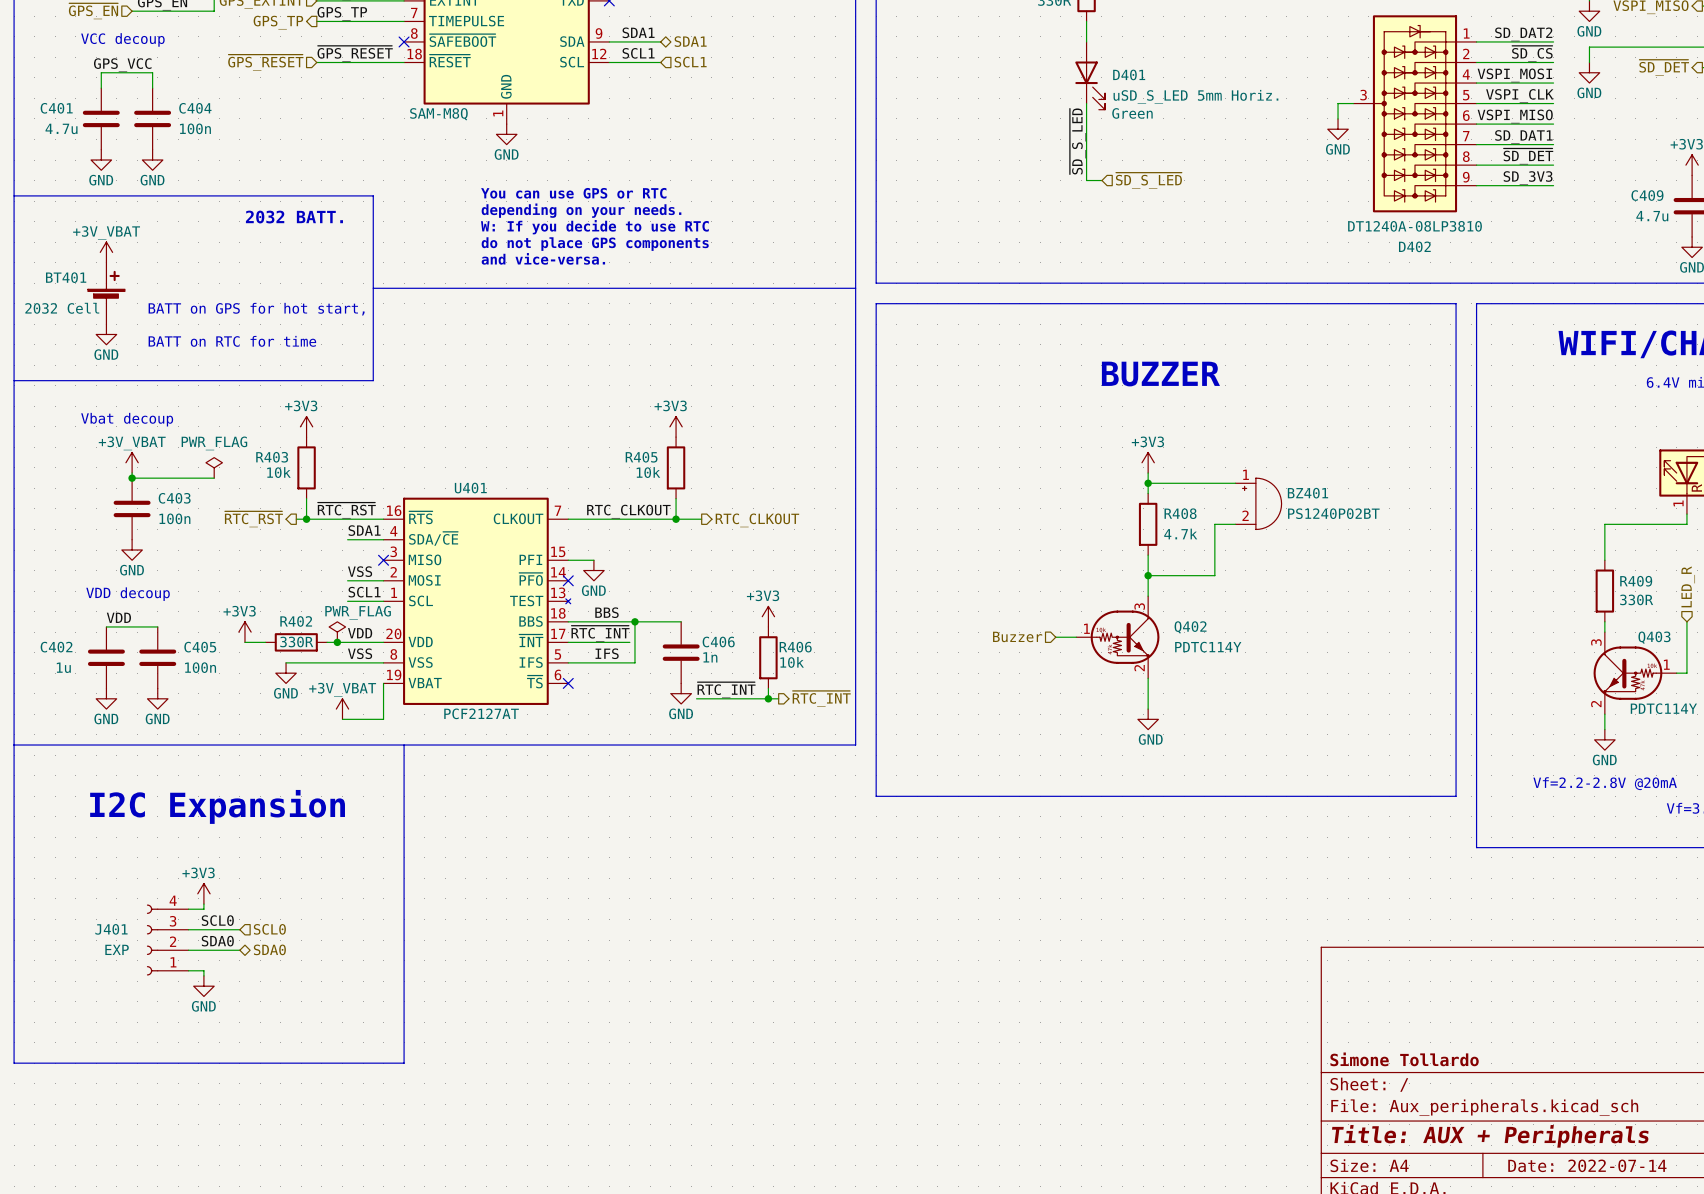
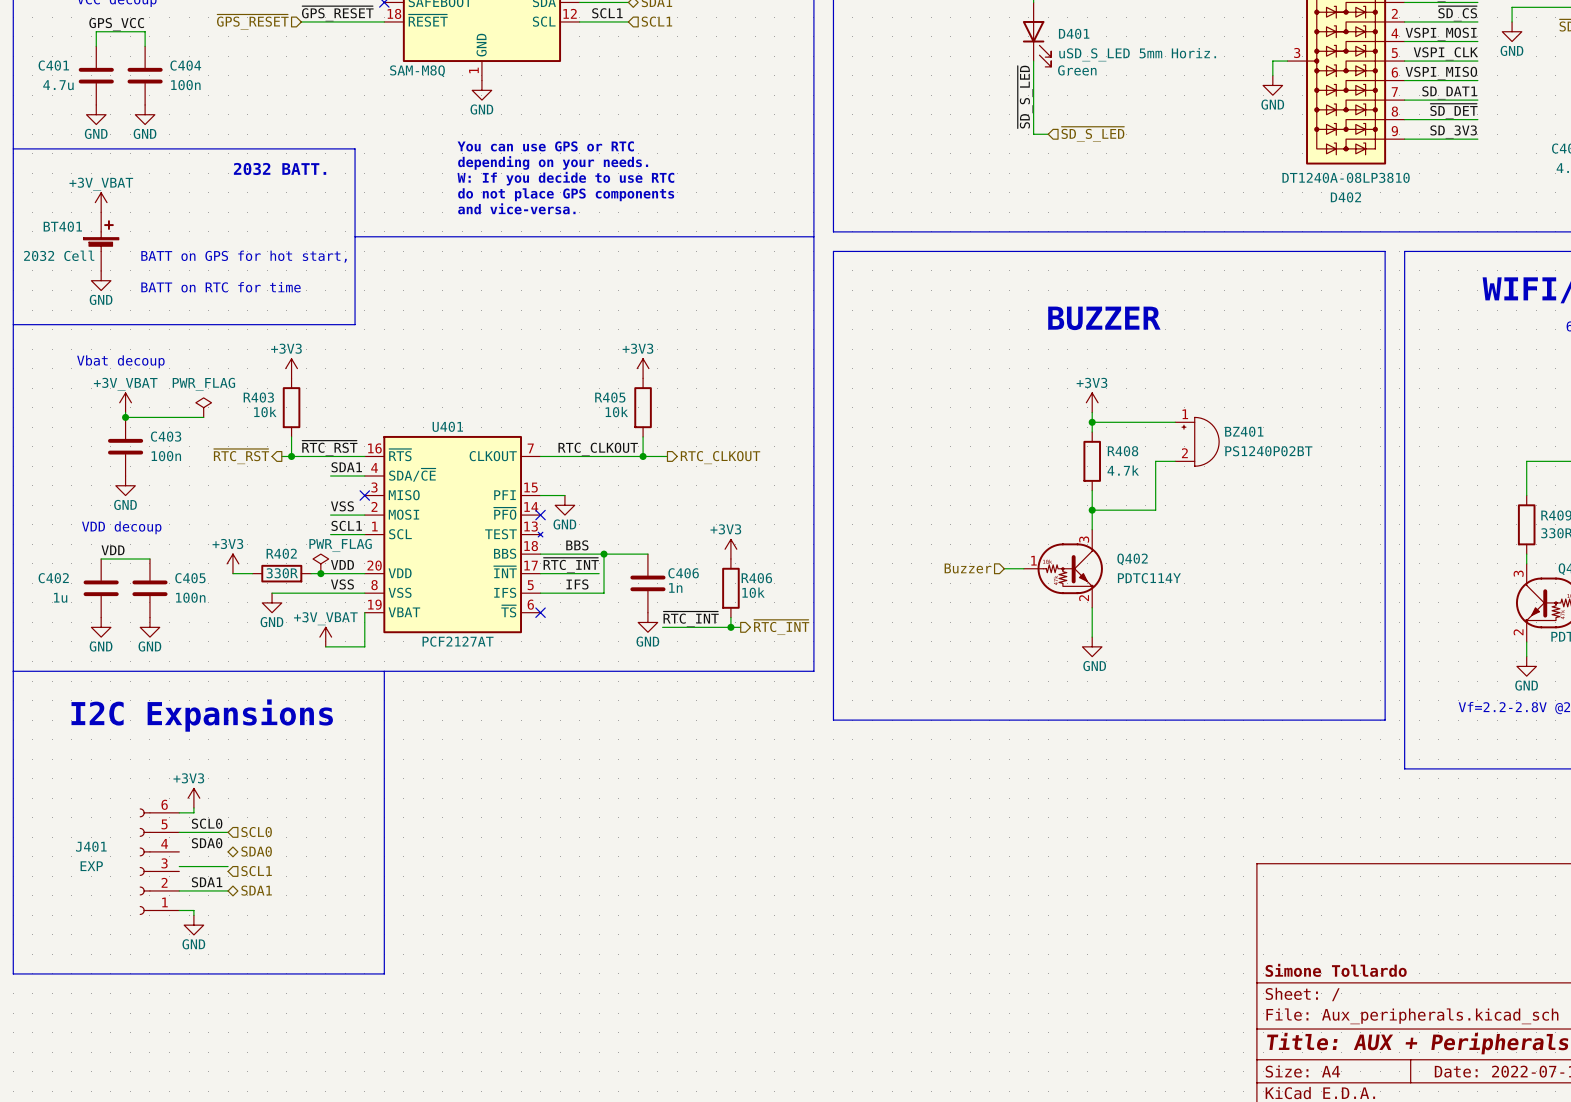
text: I2C Expansion (217, 806) -> I2C Expansions (202, 715)
power symbol position: +3V3 (203, 893) -> +3V3 (193, 798)
J401 symbol: [146, 904, 189, 976] -> [139, 808, 180, 915]
wire: (203, 904) (203, 909) (188, 909) -> (193, 807) (193, 812) (179, 812)
label position: SCL0 (217, 920) -> SCL0 (207, 823)
J401 name position: J401 (111, 929) -> J401 (91, 846)
wire: (188, 929) (239, 929) -> (179, 832) (228, 832)
hierarchical label position: SCL0 (269, 929) -> SCL0 (256, 832)
label position: SDA0 (217, 941) -> SDA0 (207, 843)
J401 value position: EXP (117, 949) -> EXP (91, 866)
hierarchical label position: SDA0 (269, 949) -> SDA0 (256, 851)
hierarchical label: none -> SCL1 (256, 871)
label: none -> SDA1 (207, 882)
wire: (188, 970) (203, 970) (203, 975) -> (179, 910) (193, 910) (193, 915)
wire: none -> (179, 890) (228, 890)
hierarchical label: none -> SDA1 (256, 890)
power symbol position: GND (203, 986) -> GND (193, 925)

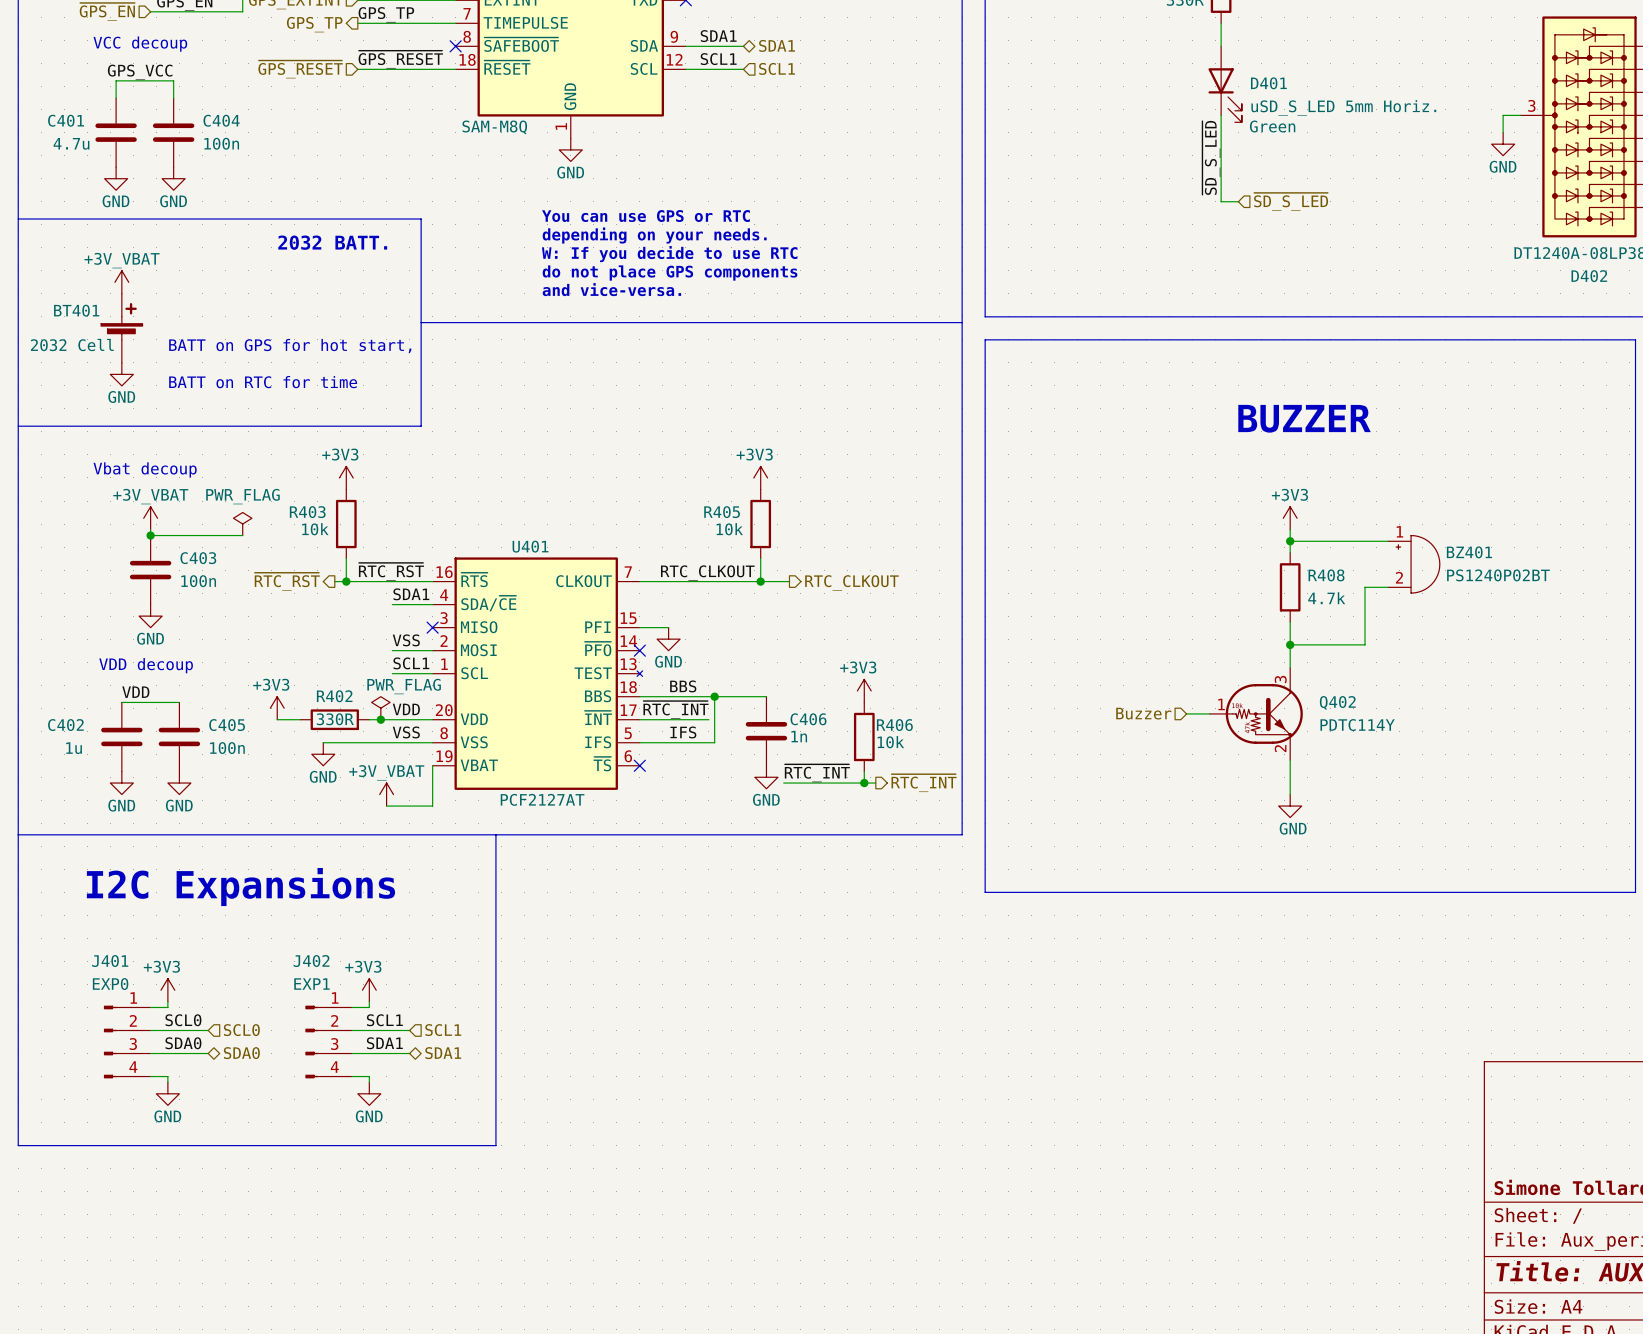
line: (384, 671) (384, 973) (13, 973) (13, 934) -> (495, 834) (495, 1145) (18, 1145)
power symbol position: +3V3 (193, 798) -> +3V3 (167, 990)
power symbol: none -> +3V3 (369, 990)
wire: (193, 807) (193, 812) (179, 812) -> (167, 1001) (167, 1007) (150, 1007)
J401 symbol: [139, 808, 180, 915] -> [103, 1005, 151, 1079]
wire: none -> (369, 1001) (369, 1007) (352, 1007)
label position: SCL0 (207, 823) -> SCL0 (183, 1020)
label: none -> SCL1 (384, 1020)
wire: (179, 832) (228, 832) -> (150, 1030) (208, 1030)
hierarchical label position: SCL0 (256, 832) -> SCL0 (241, 1030)
wire: none -> (352, 1030) (409, 1030)
label position: SDA0 (207, 843) -> SDA0 (183, 1043)
J401 name position: J401 (91, 846) -> J401 (110, 961)
J402: none -> EXP1 (328, 1042)
hierarchical label position: SDA0 (256, 851) -> SDA0 (241, 1053)
J401 value: EXP (91, 866) -> EXP0 (110, 984)
wire: (179, 866) (228, 866) -> (352, 1053) (409, 1053)
hierarchical label position: SCL1 (256, 871) -> SCL1 (443, 1030)
wire: none -> (352, 1076) (369, 1076) (369, 1082)
label position: SDA1 (207, 882) -> SDA1 (384, 1043)
power symbol: none -> GND (167, 1093)
wire: (179, 890) (228, 890) -> (150, 1053) (208, 1053)
hierarchical label position: SDA1 (256, 890) -> SDA1 (443, 1053)
power symbol: none -> GND (369, 1093)
wire: (179, 910) (193, 910) (193, 915) -> (150, 1076) (167, 1076) (167, 1082)
power symbol: GND (193, 925) -> none

